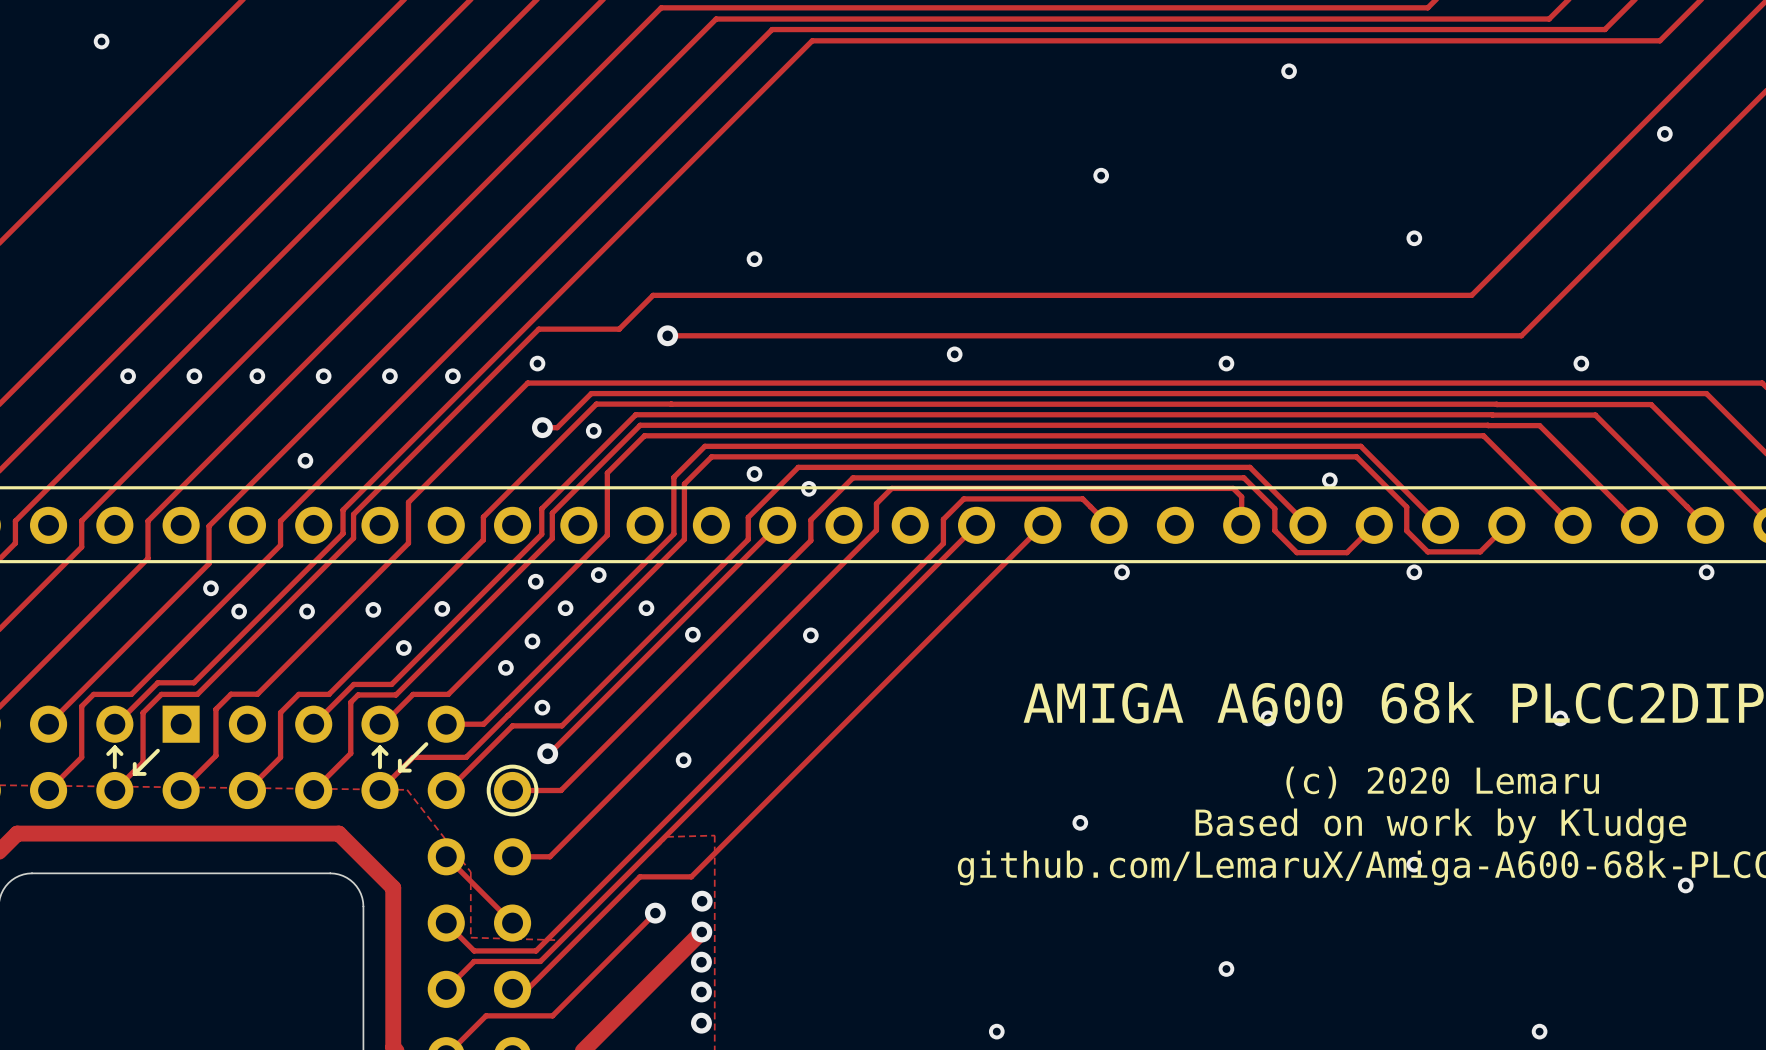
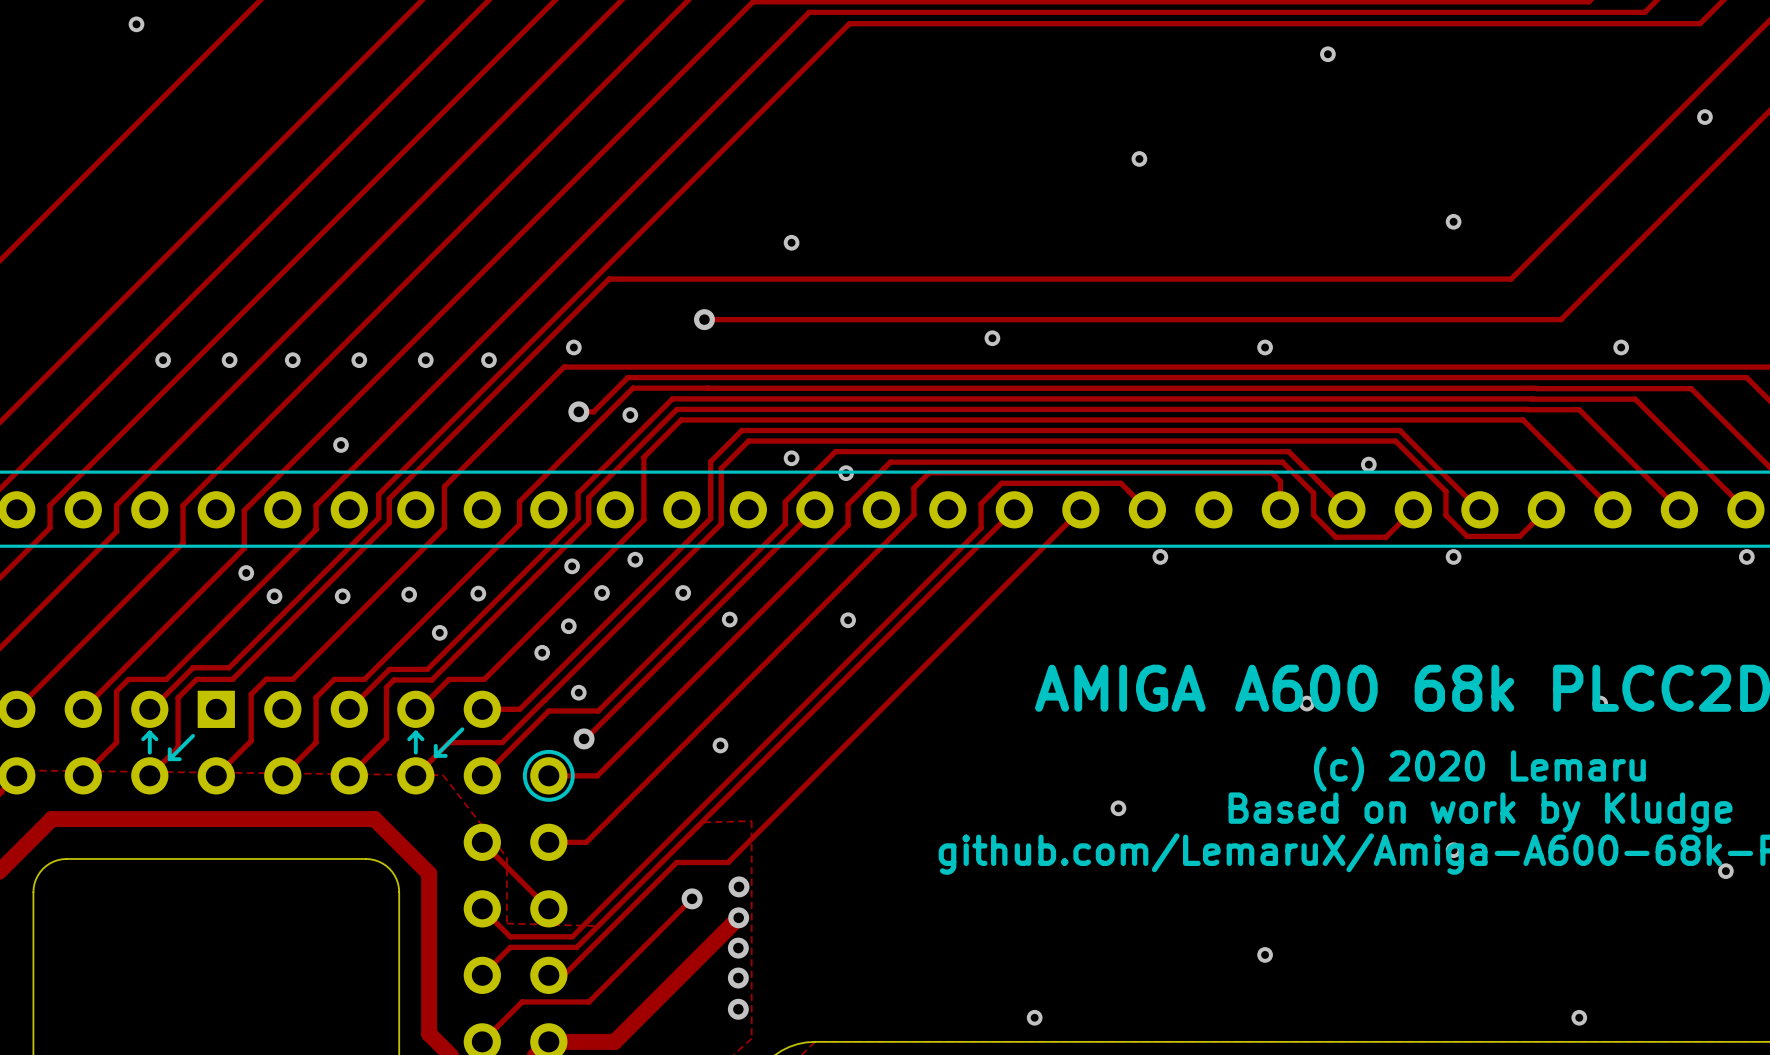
track: (653, 295) (619, 329) (538, 329) -> (689, 279) (609, 279) (575, 312)

